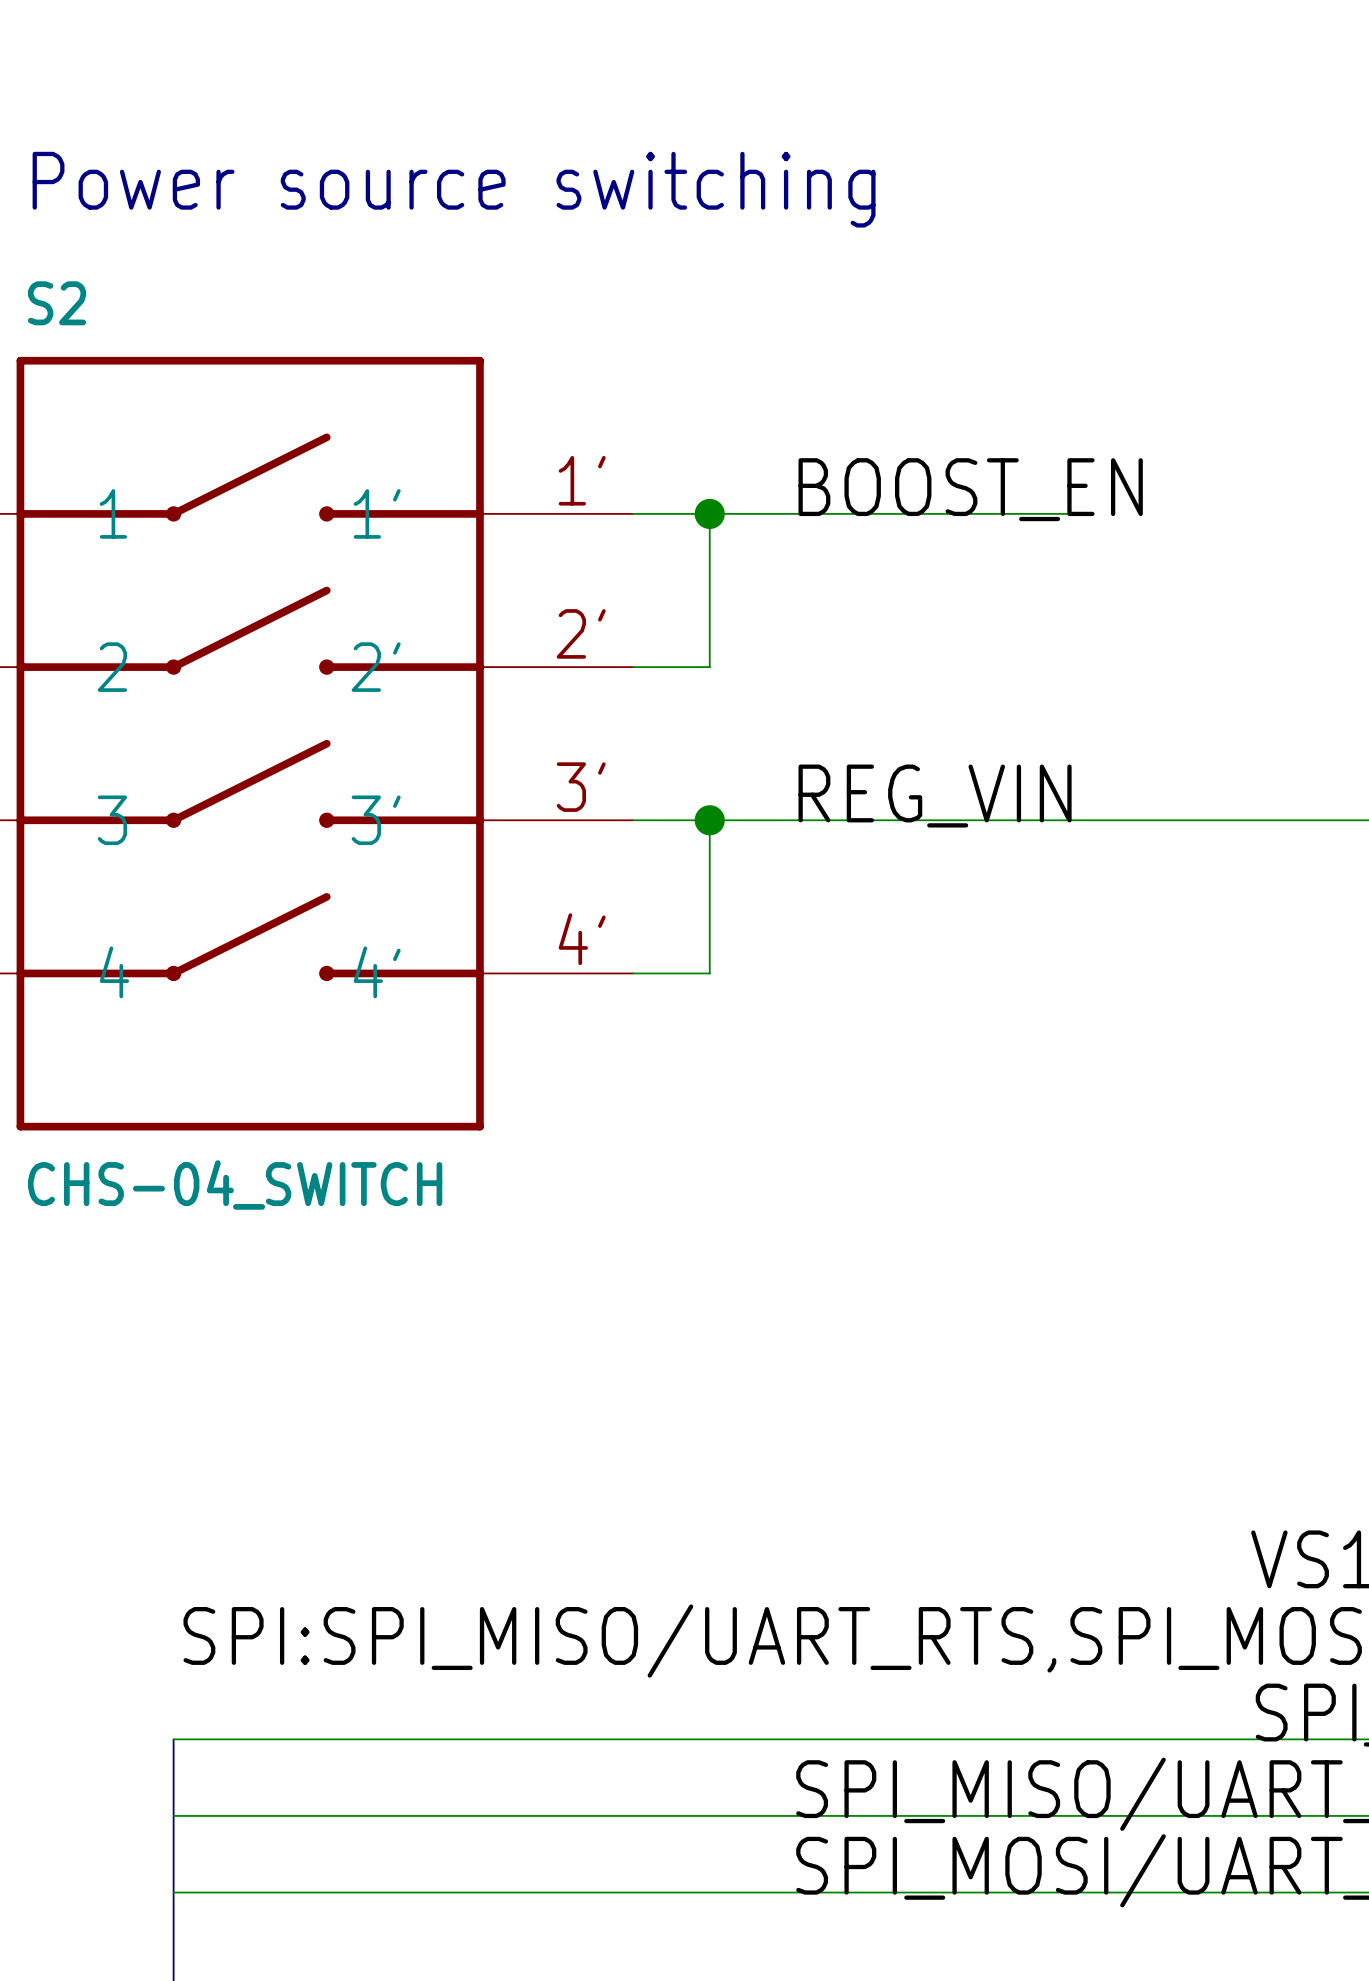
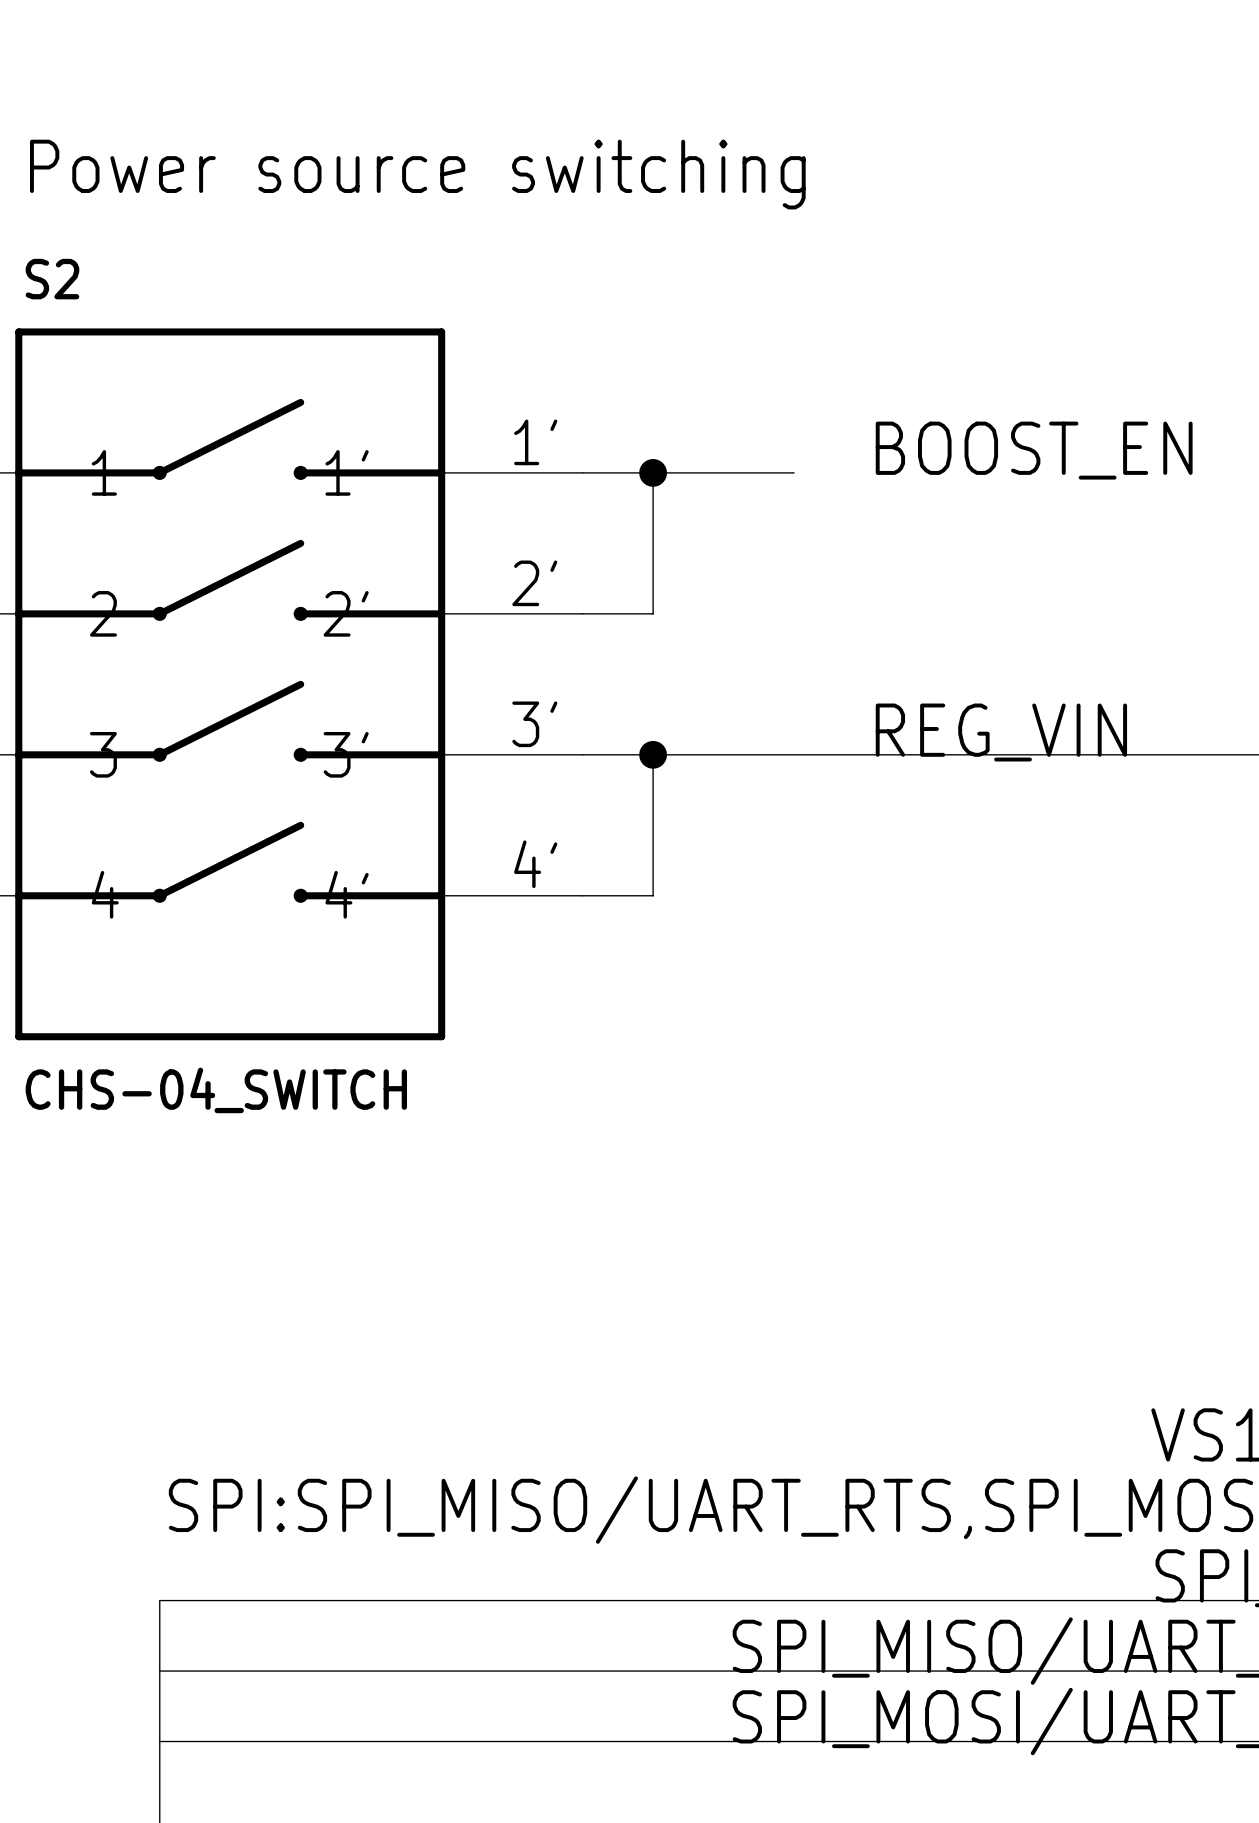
label position: BOOST_EN (970, 489) -> BOOST_EN (1034, 450)
wire: (862, 513) (1092, 513) -> none
label position: REG_VIN (935, 796) -> REG_VIN (1001, 732)

